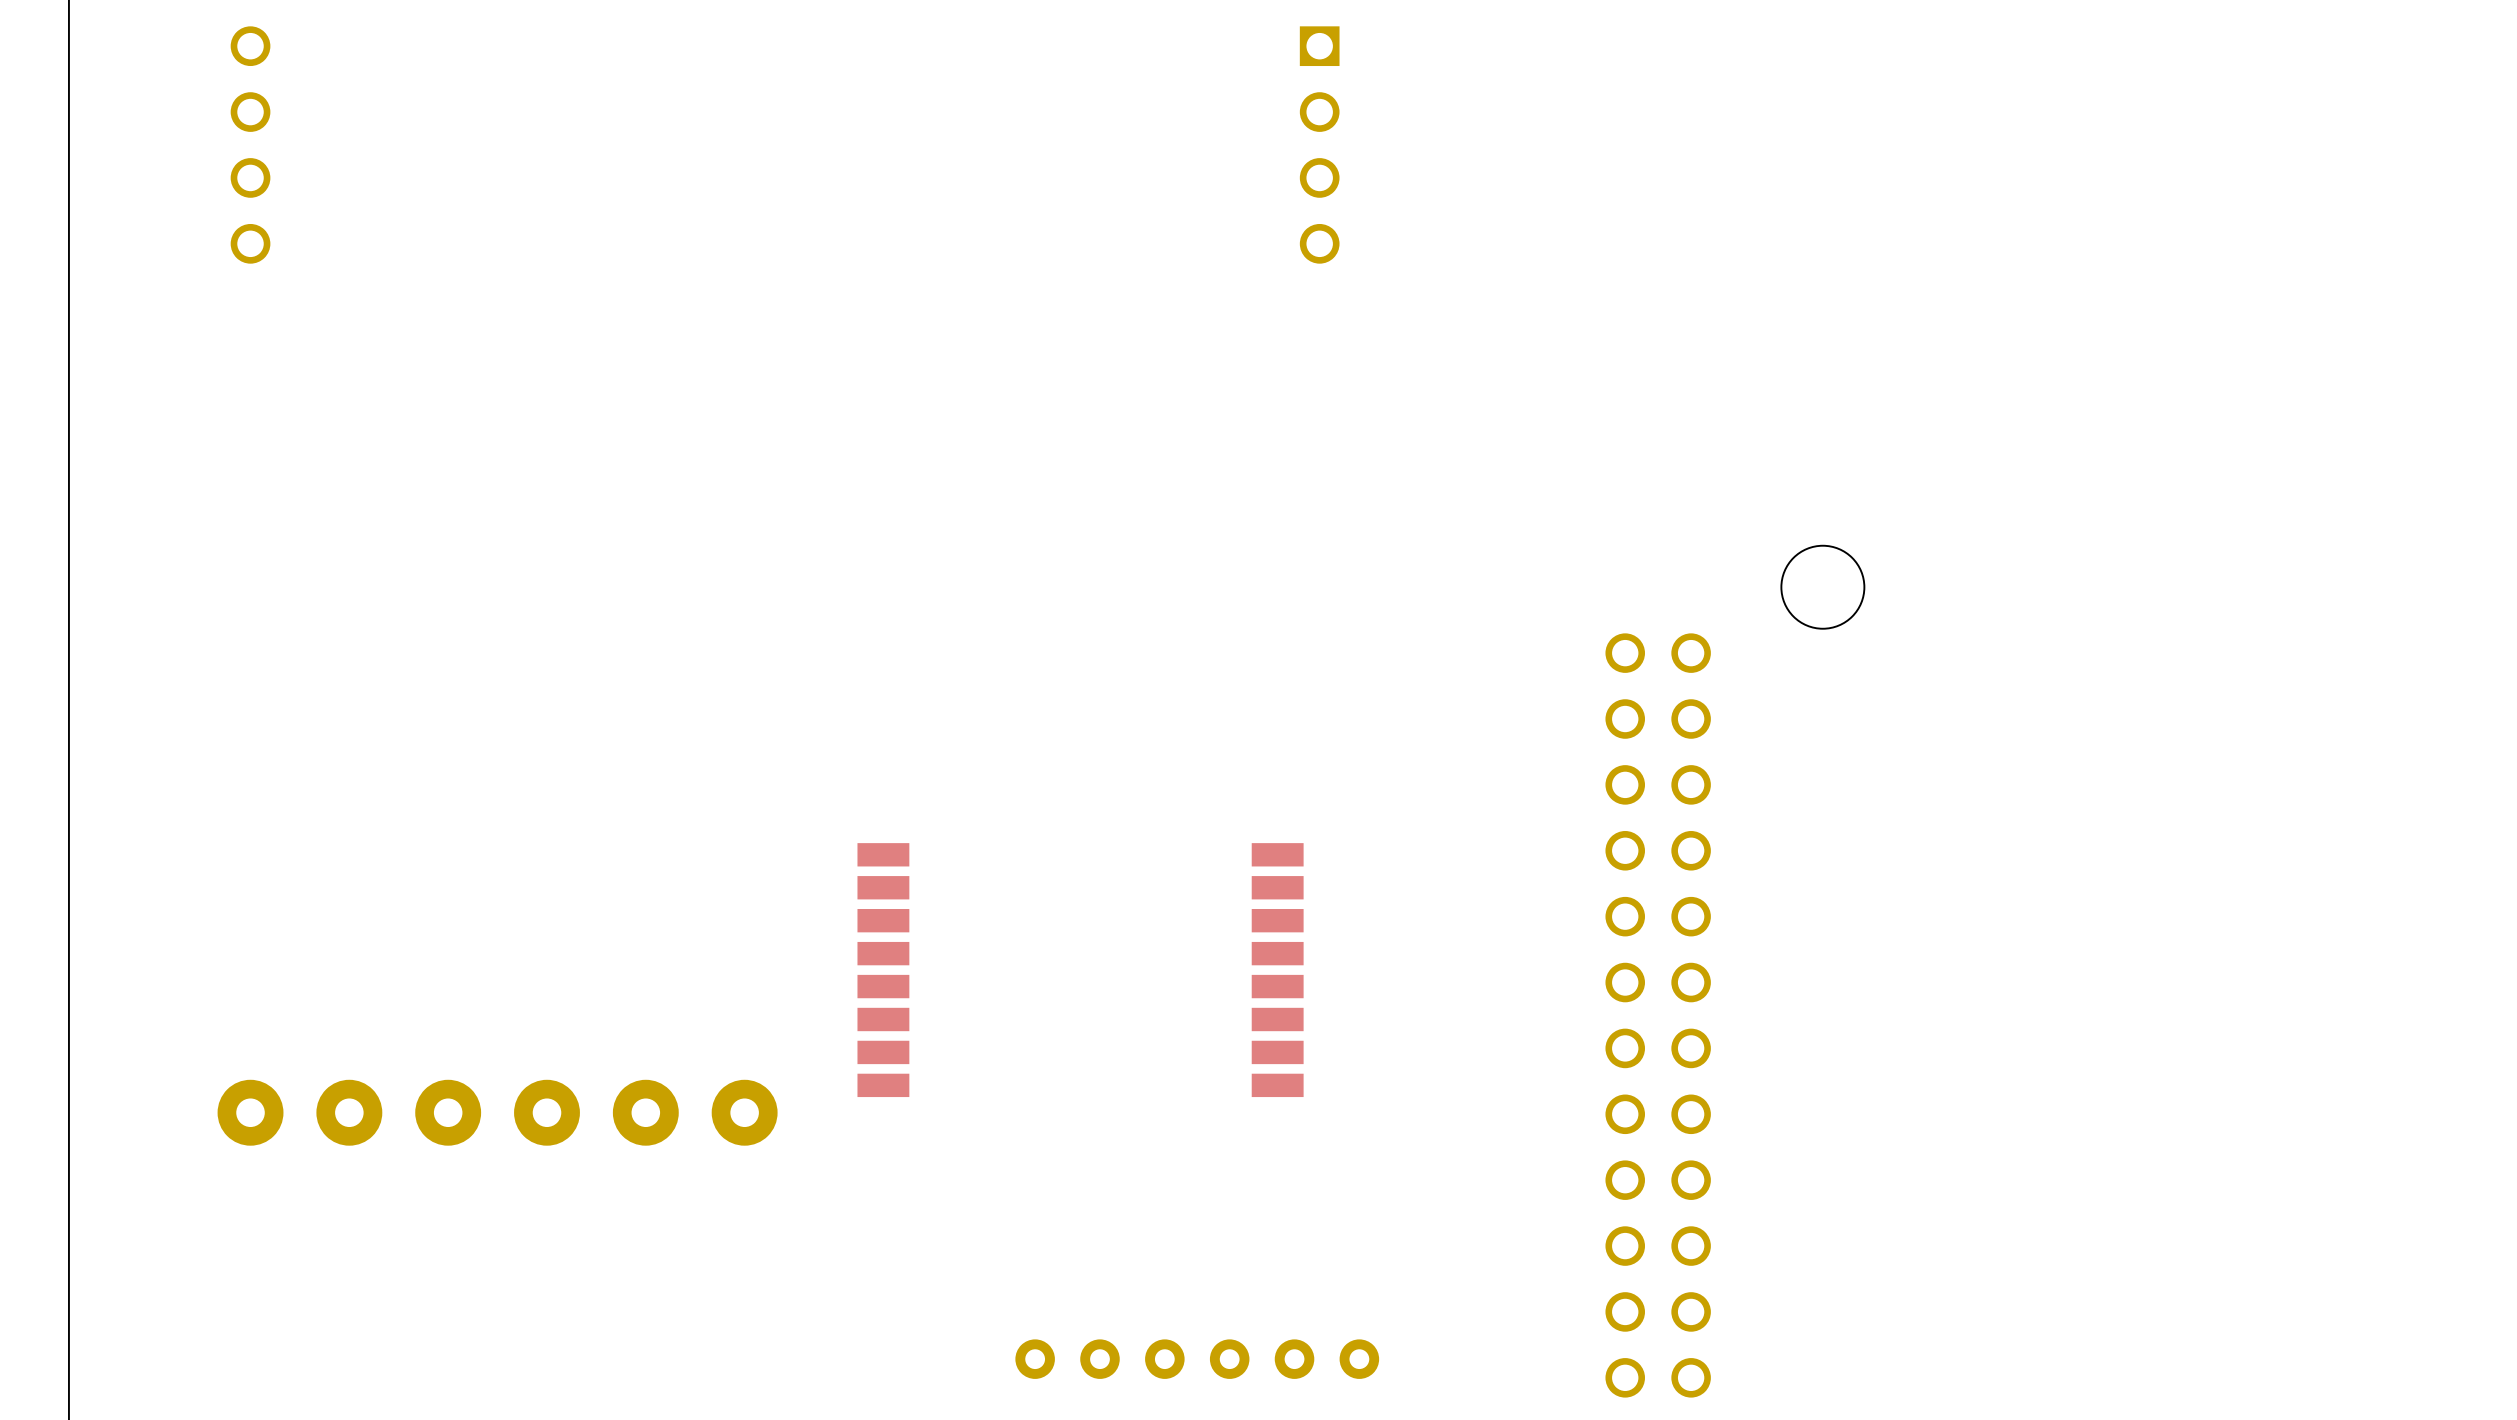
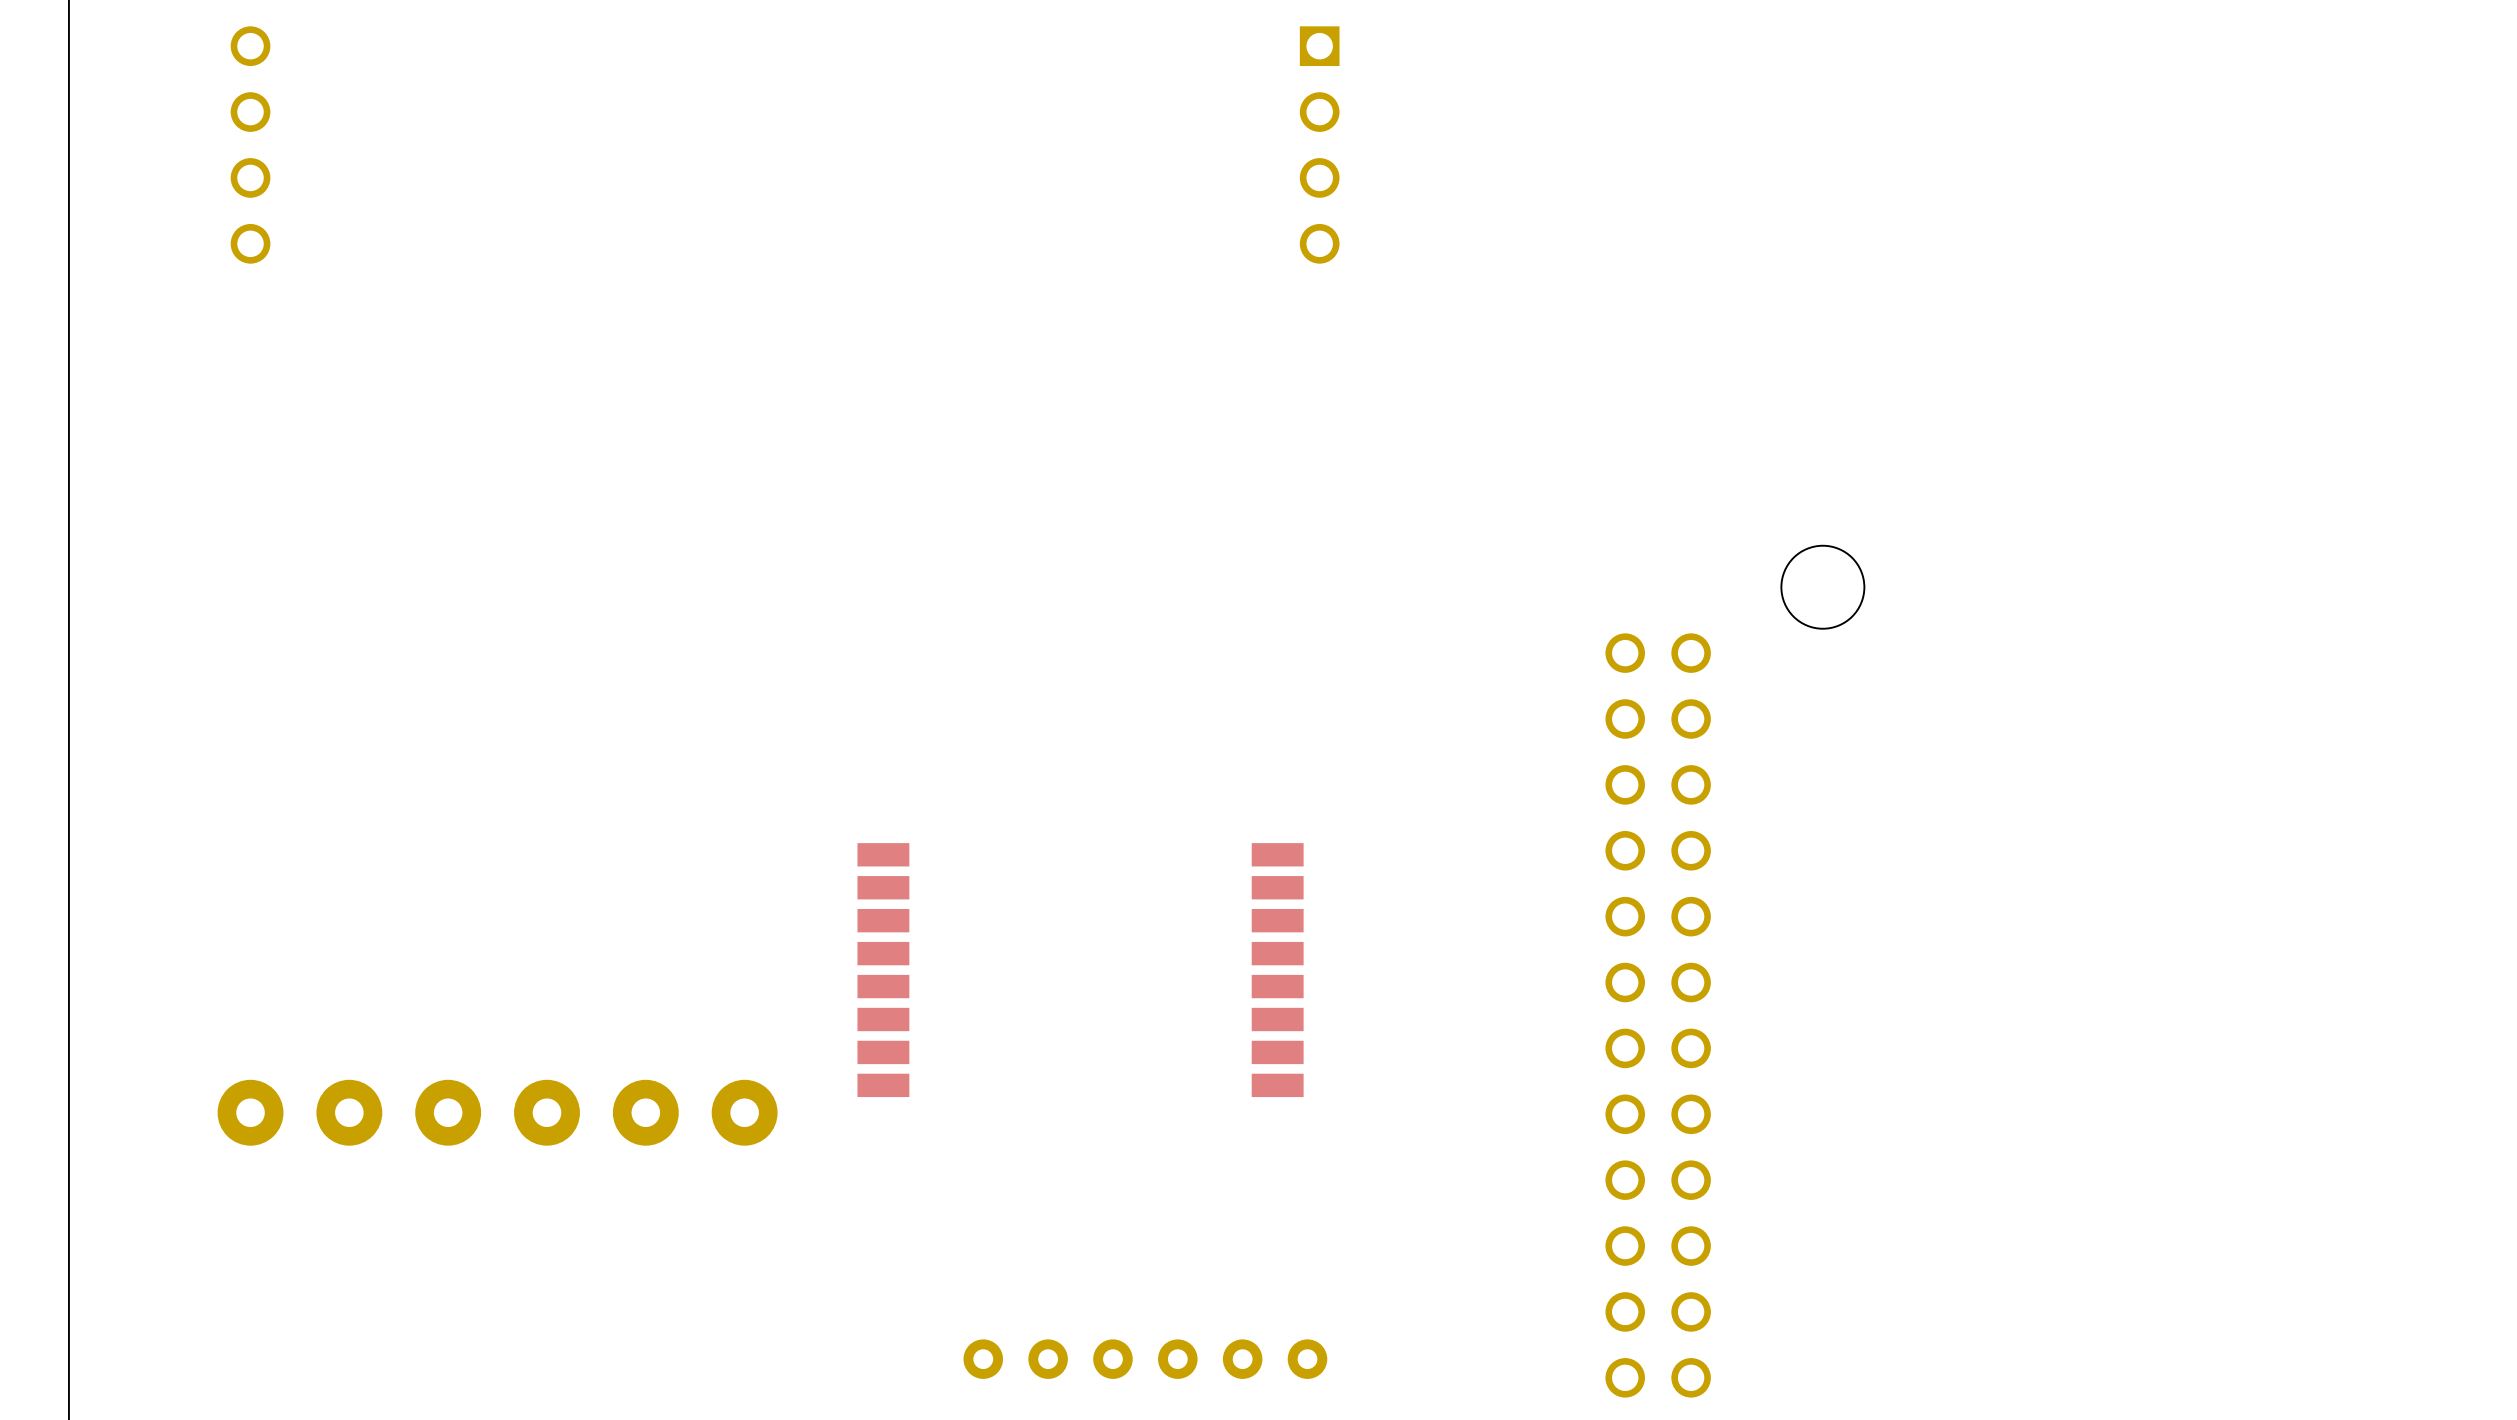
part position: (1197, 1359) -> (1145, 1359)

